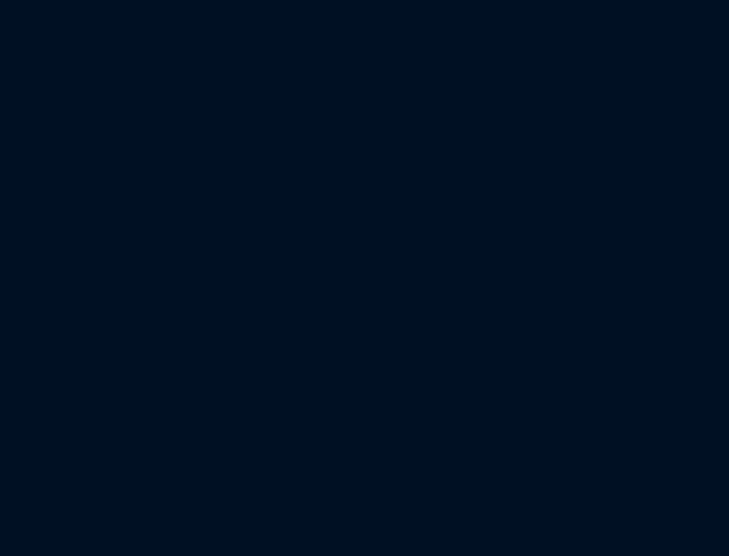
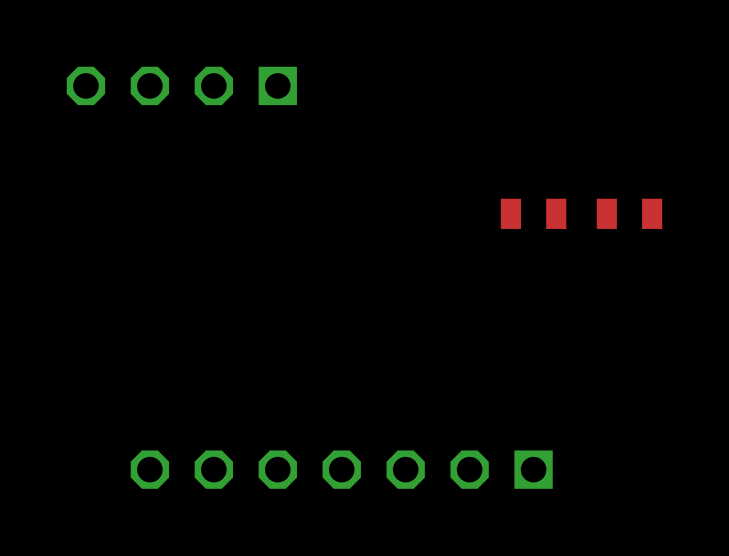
part: none -> (181, 85)
part: none -> (533, 213)
part: none -> (629, 213)
part: none -> (341, 469)

